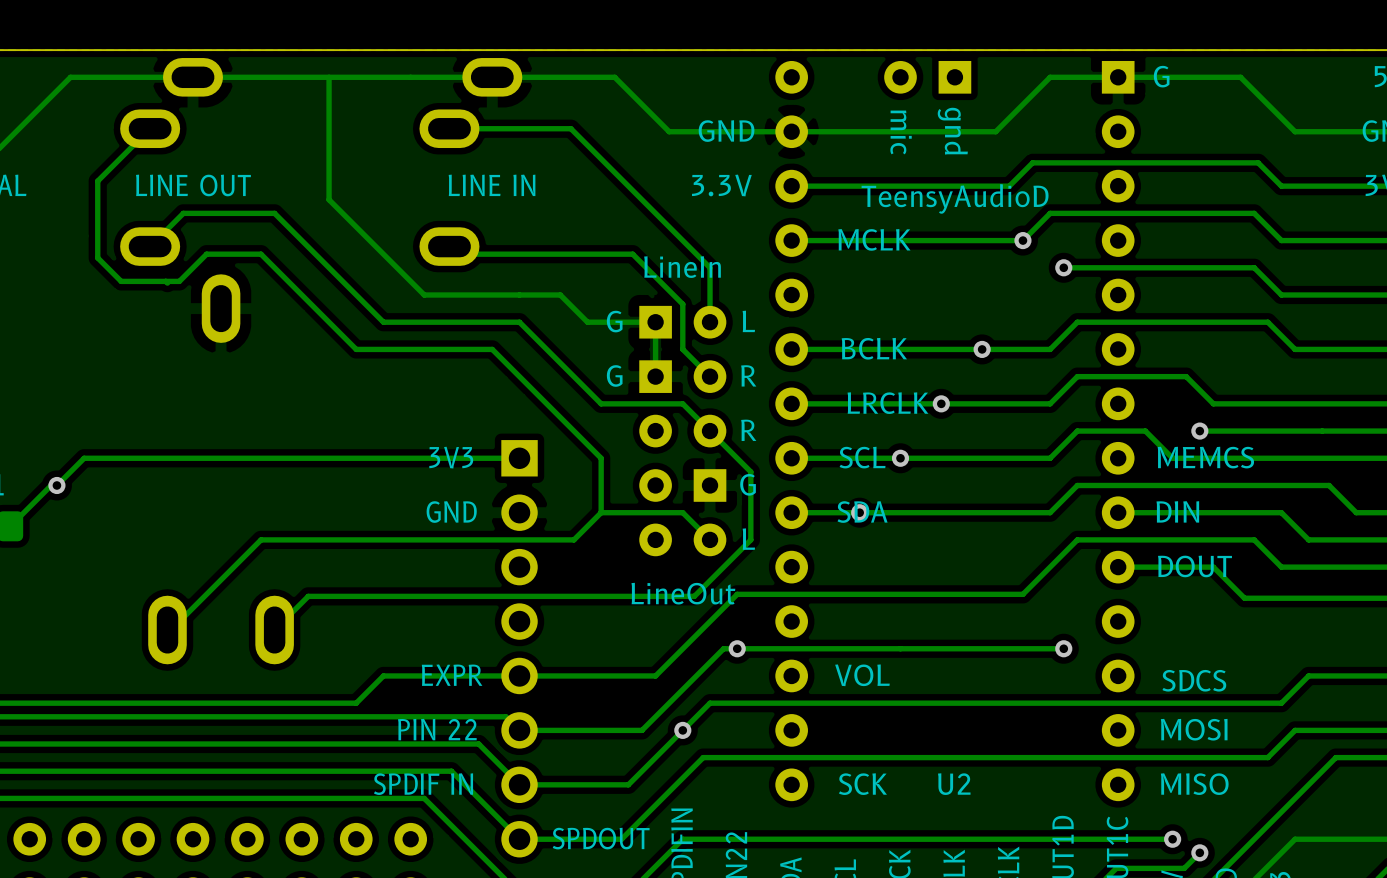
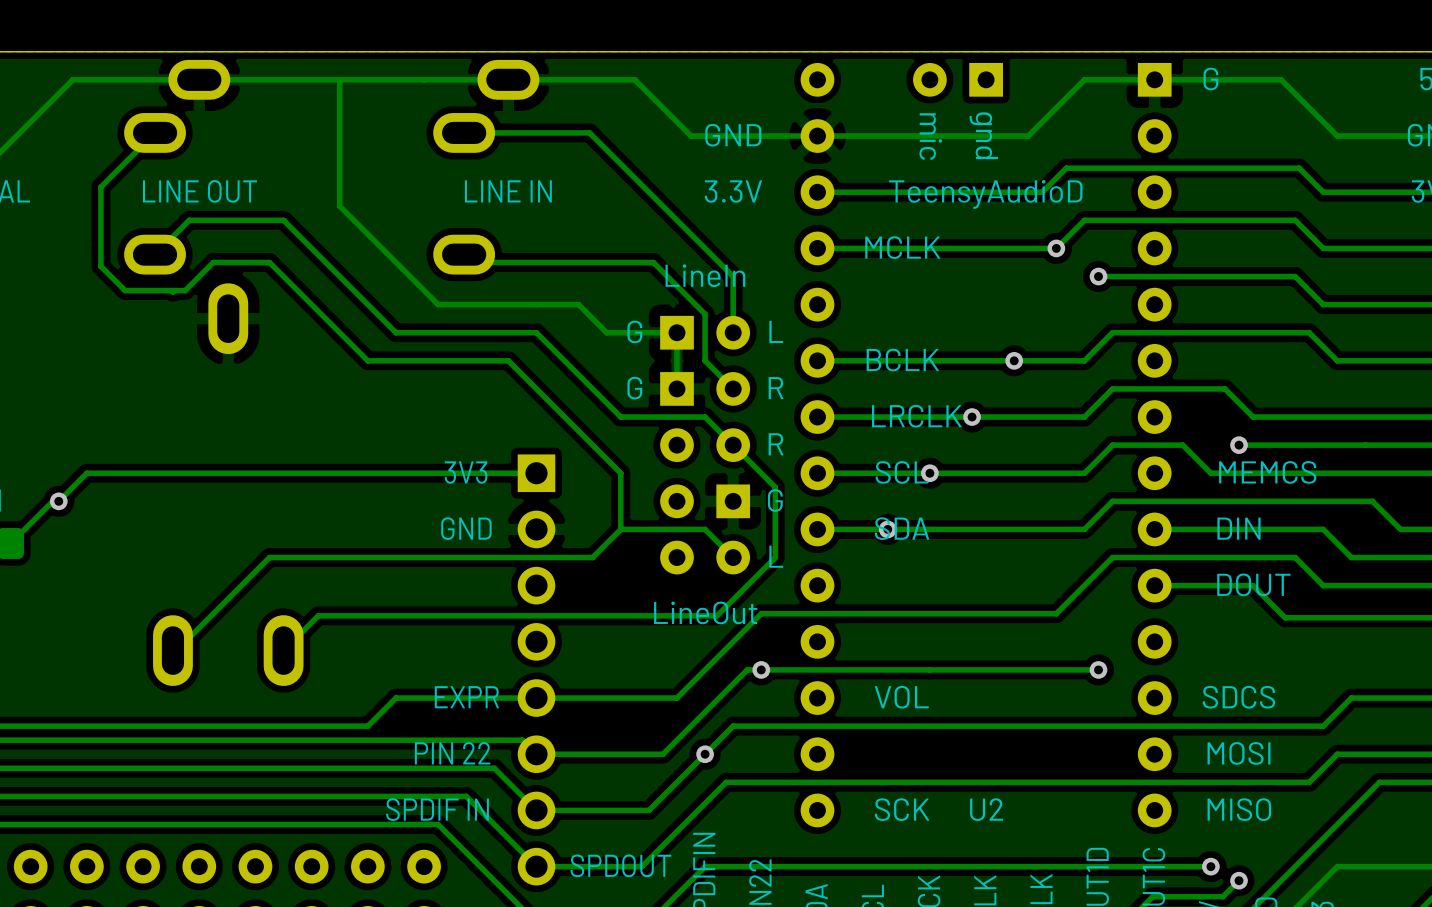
U2 footprint: [639, 60, 1135, 802] -> [660, 62, 1172, 828]

